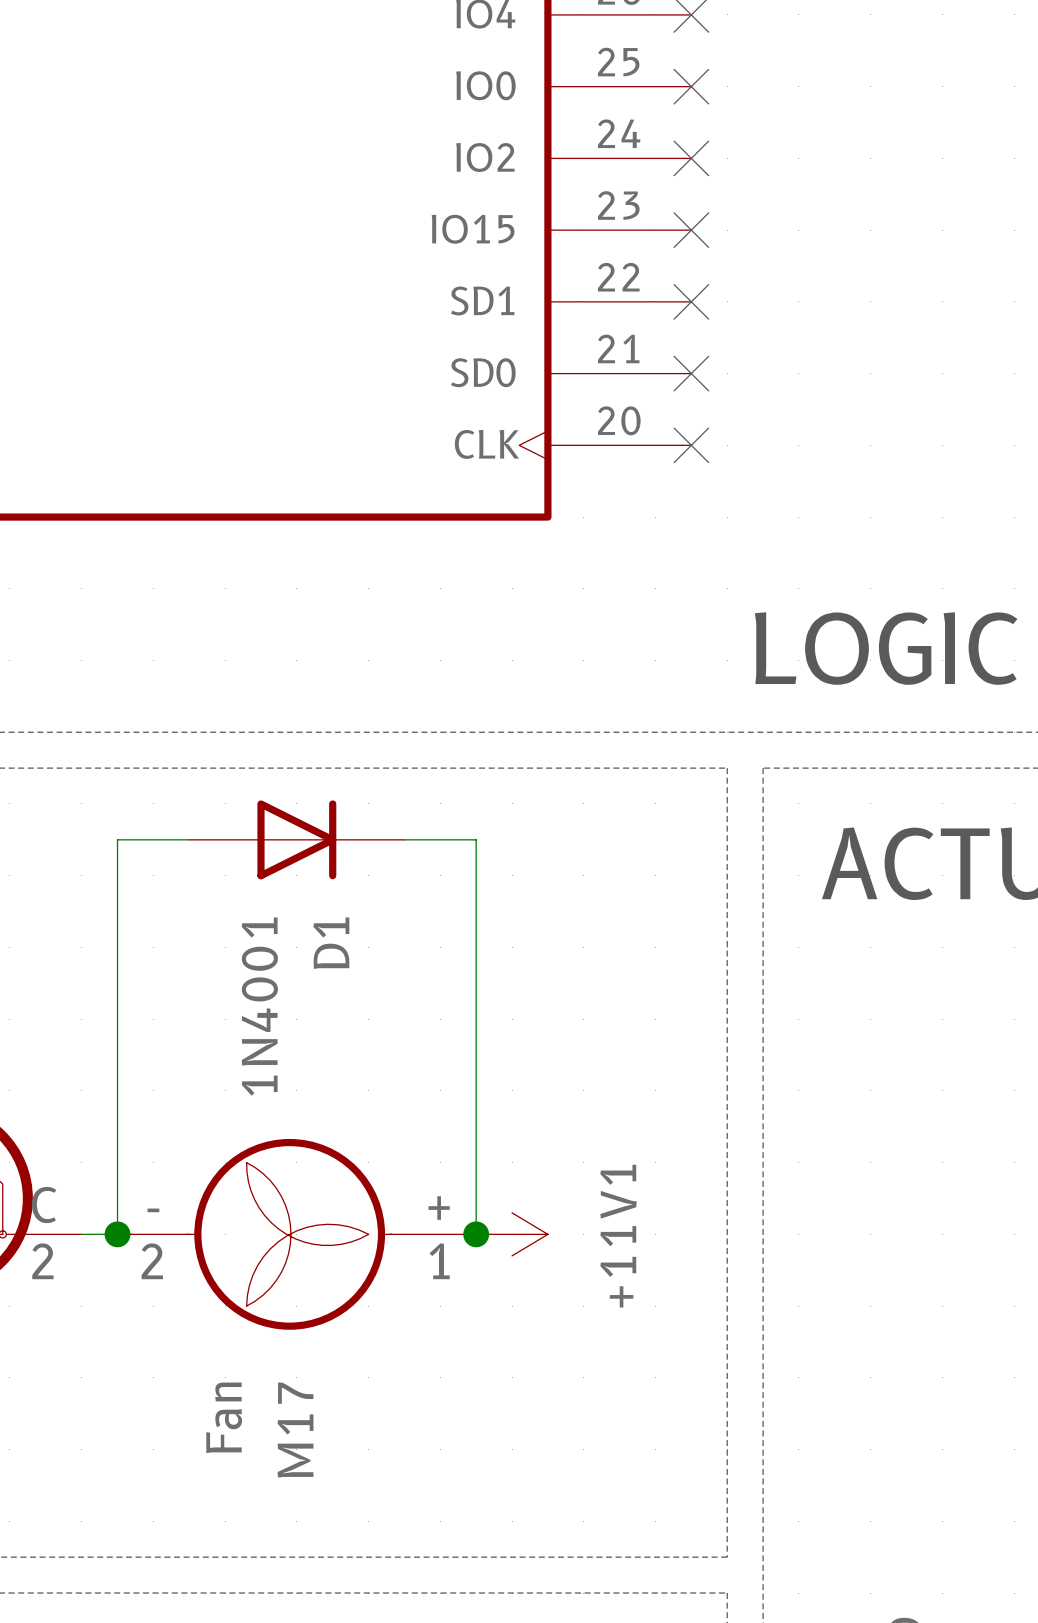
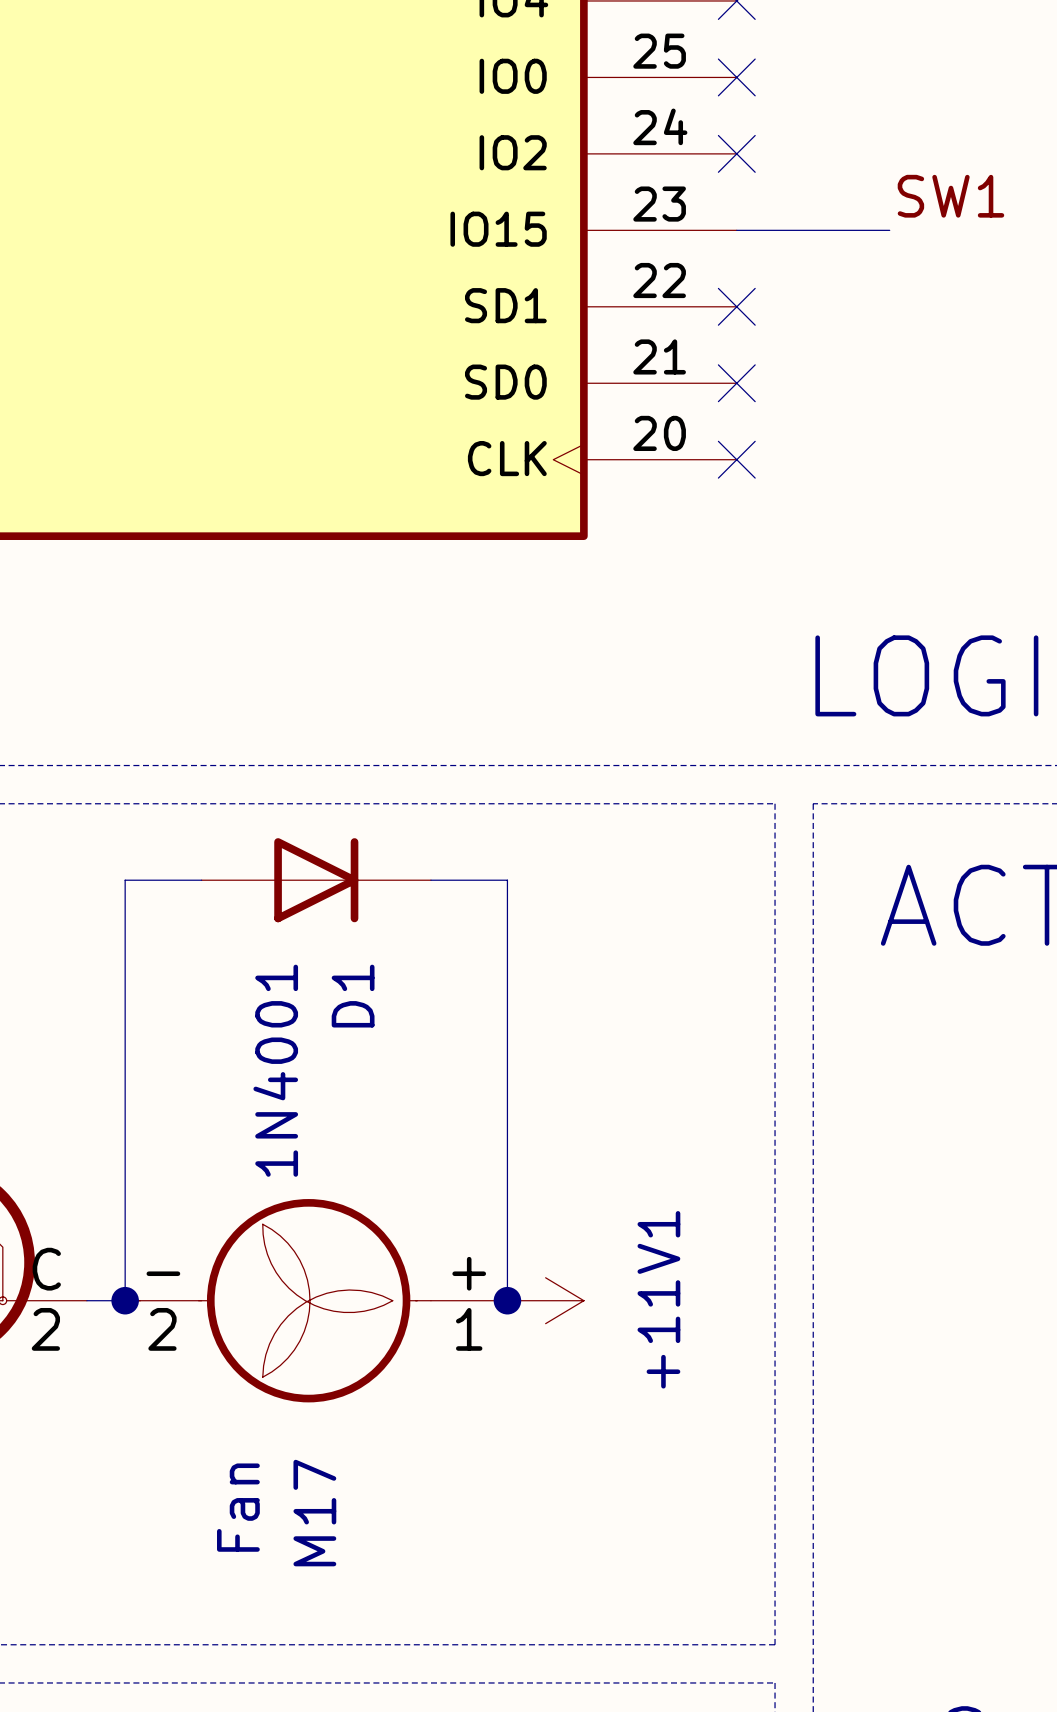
label: none -> SW1 (950, 196)
wire: none -> (736, 230) (889, 230)
no-connect mark: (691, 230) -> none

